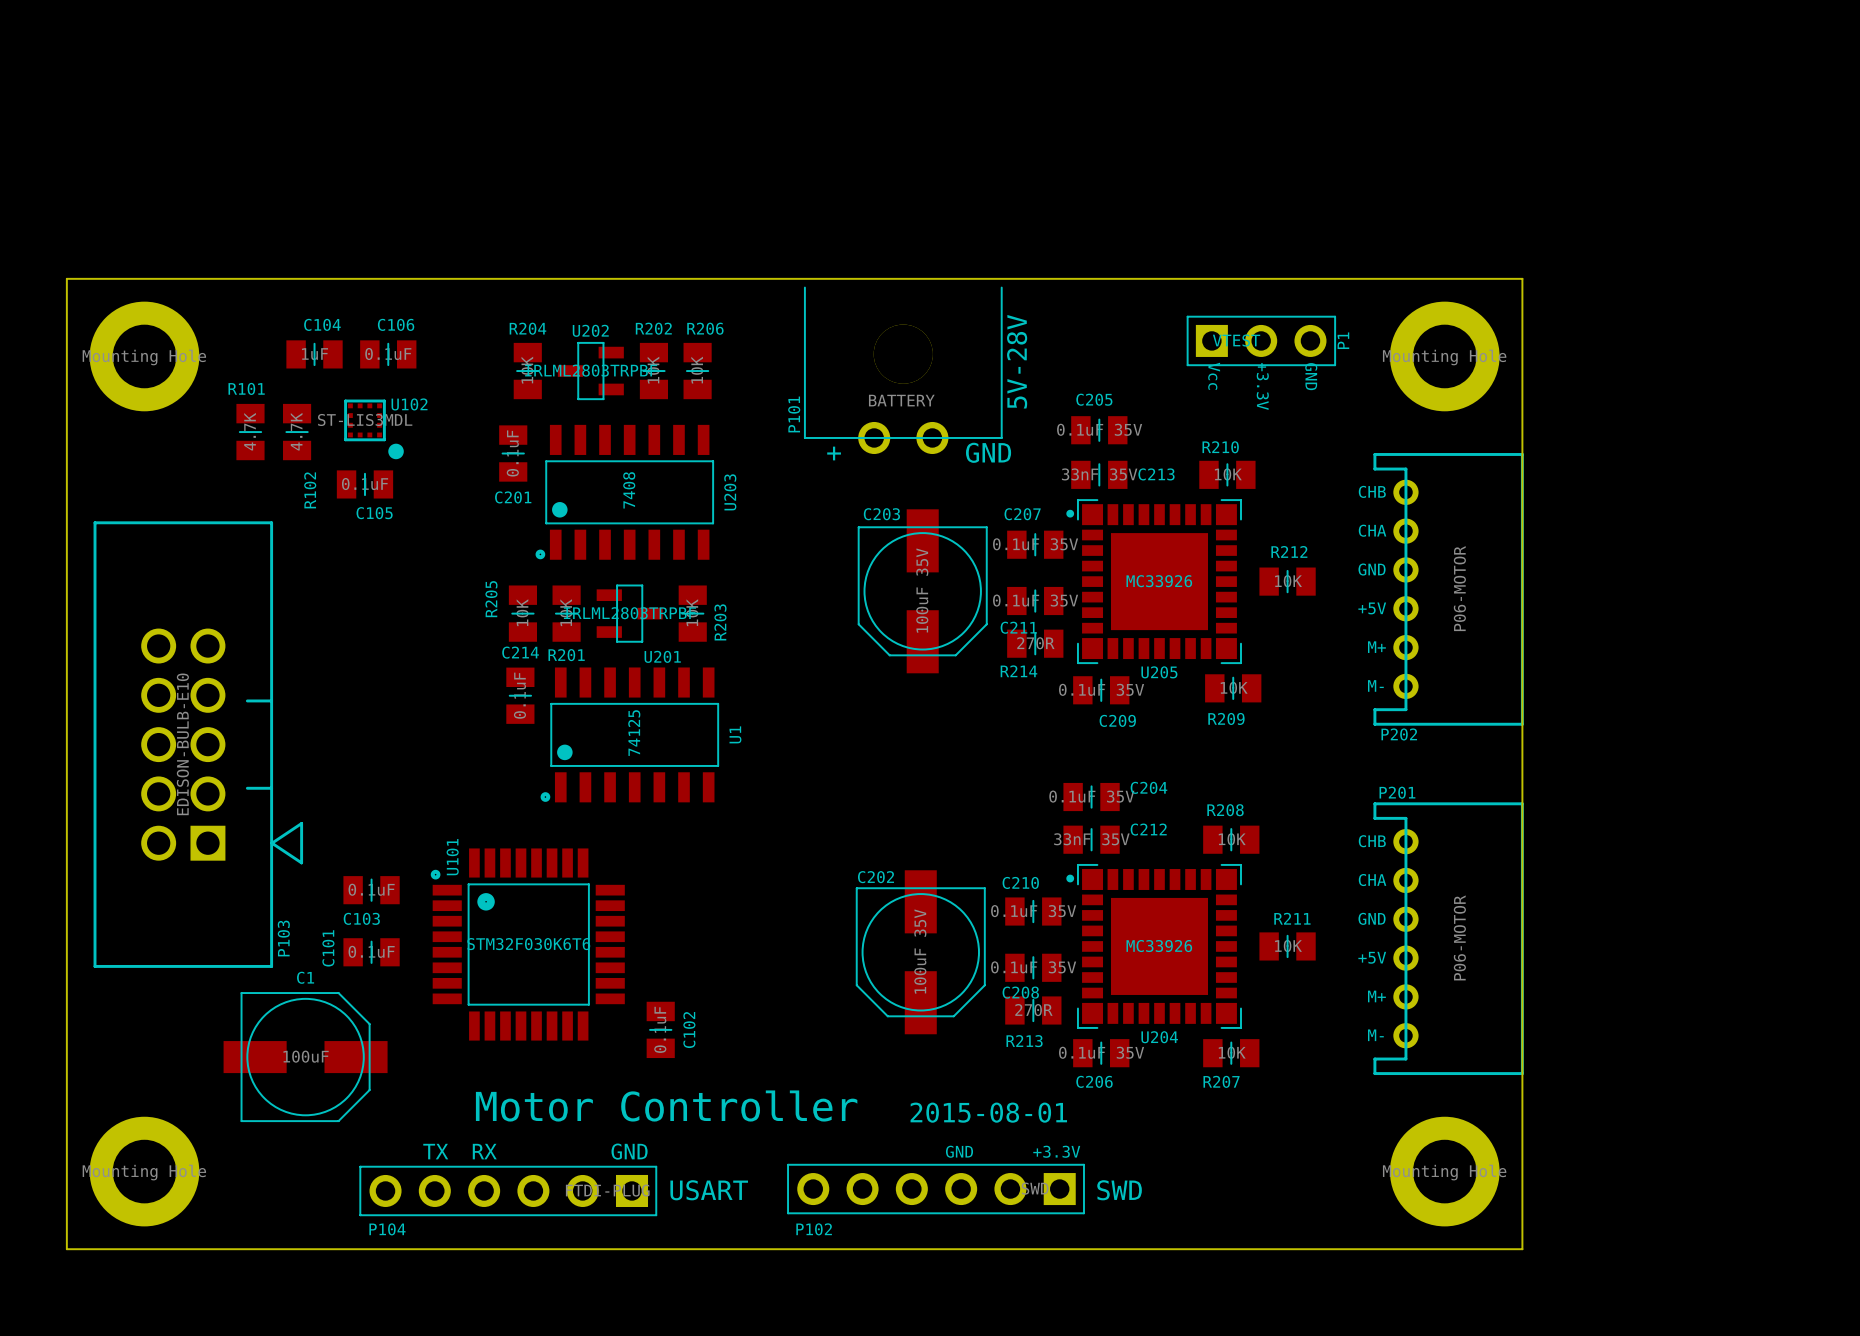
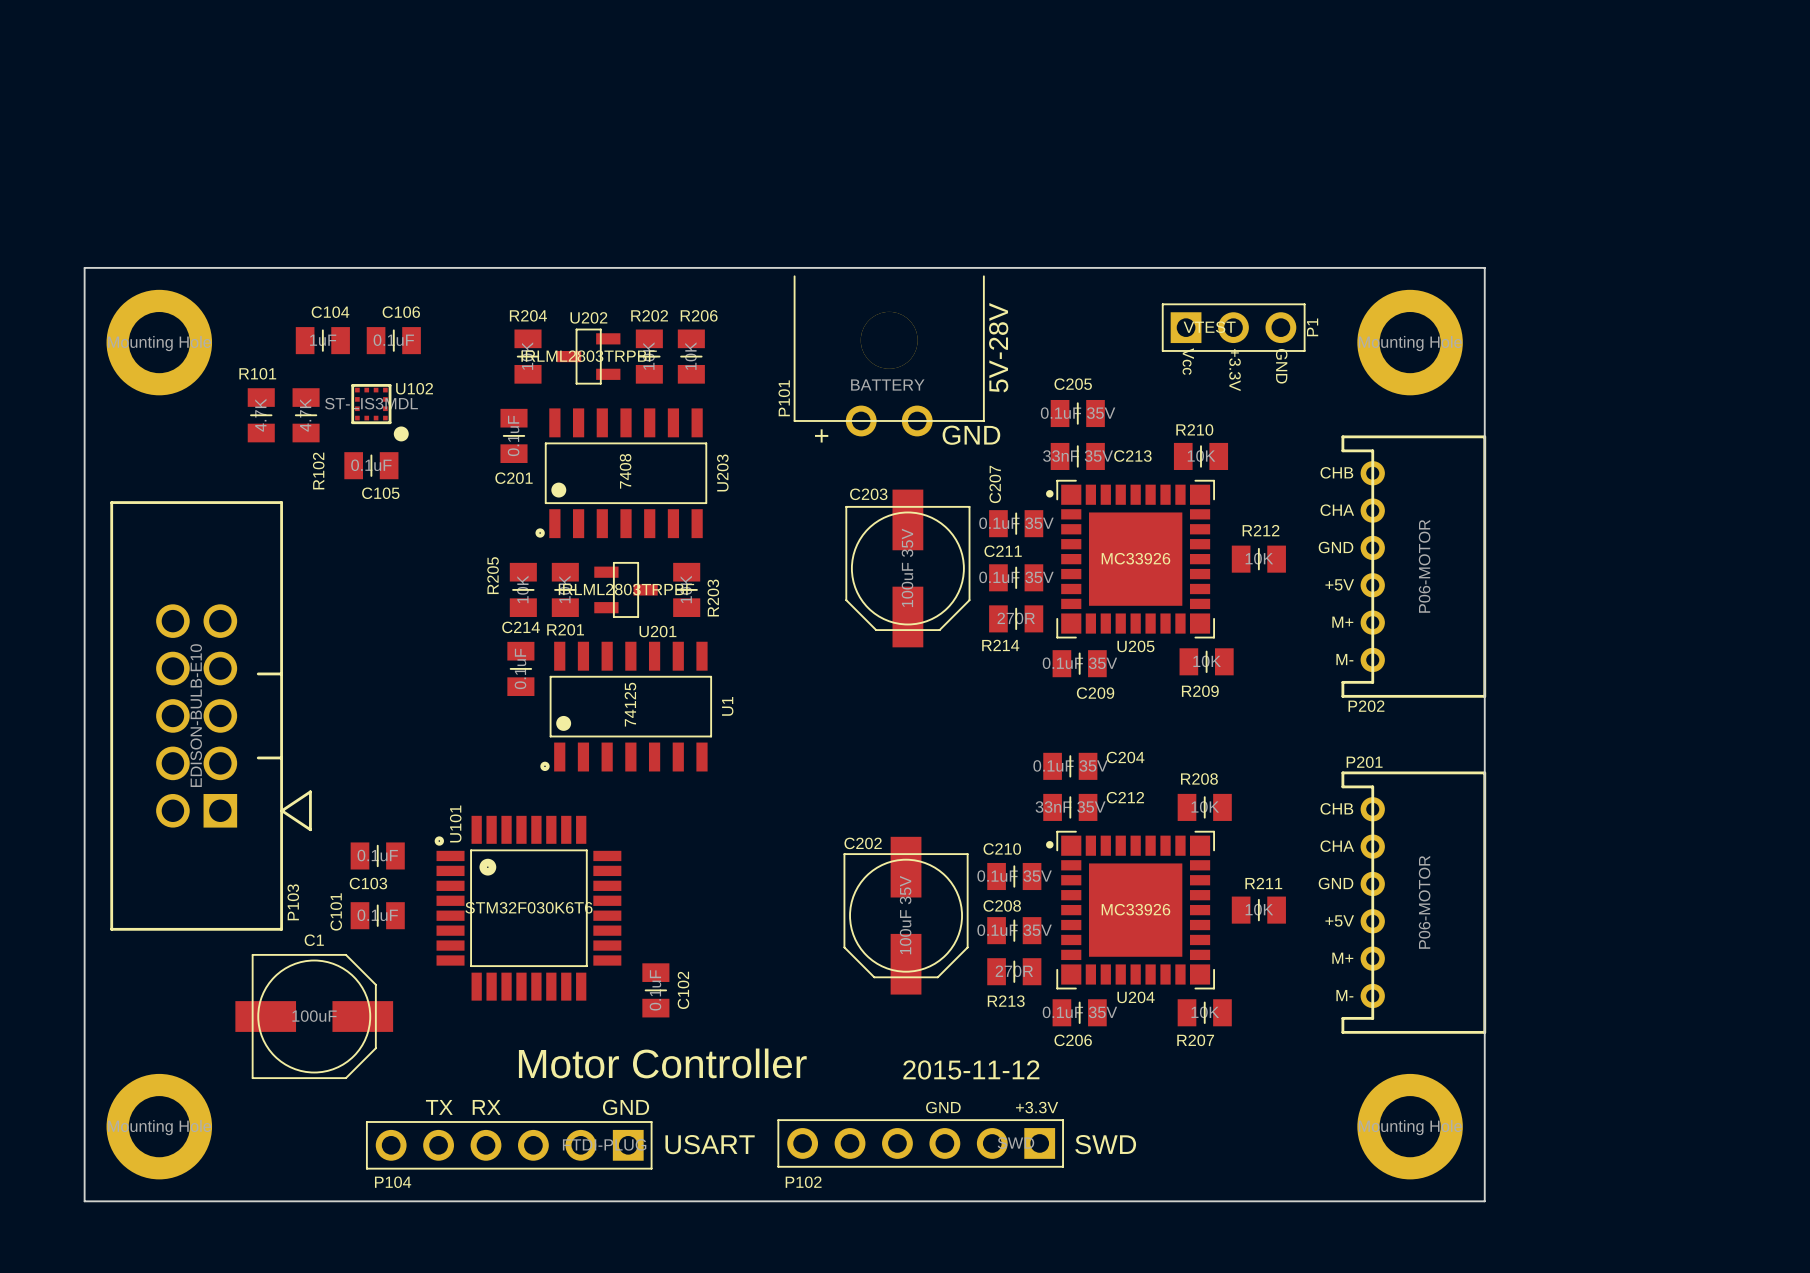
C207 name rotation: 0° (1022, 514) -> 90° counterclockwise (995, 484)
C211 name position: C211 (1018, 627) -> C211 (1003, 551)
C208 name position: C208 (1020, 992) -> C208 (1002, 905)
text: 2015-08-01 (988, 1112) -> 2015-11-12 (971, 1069)

